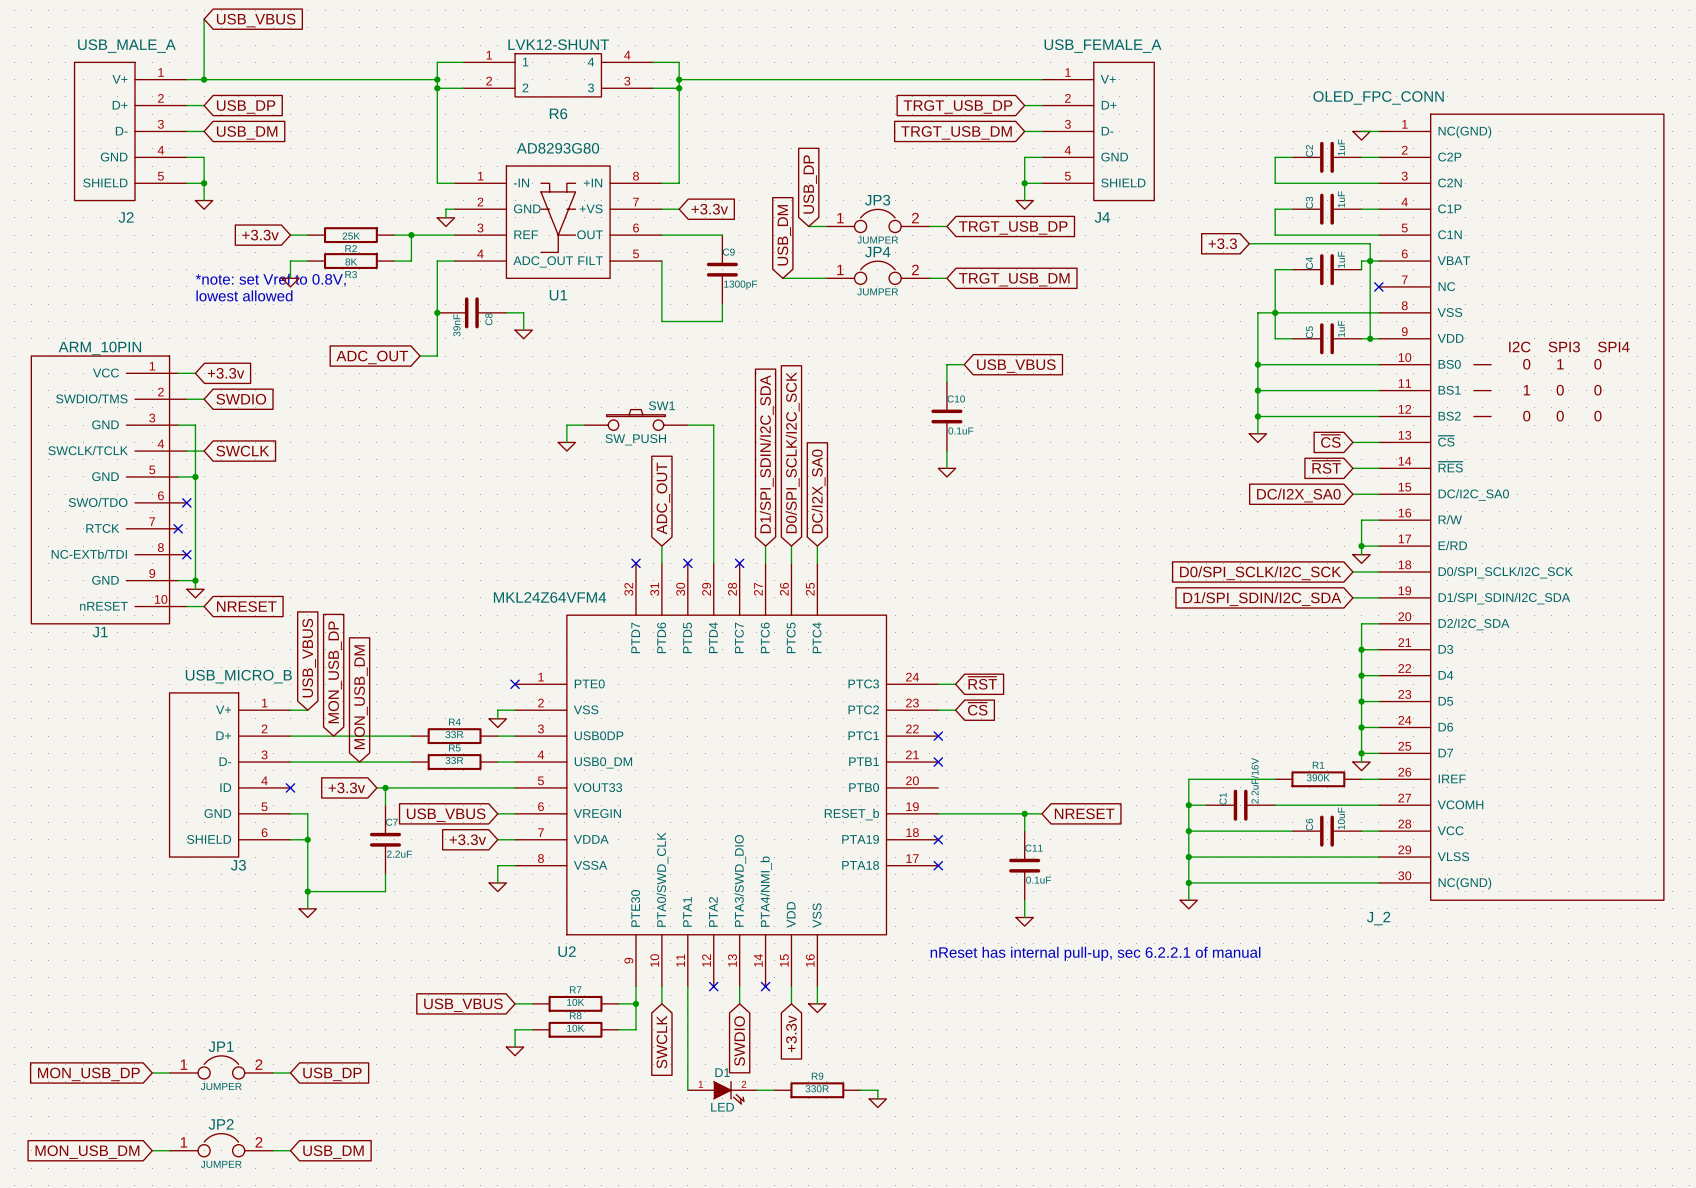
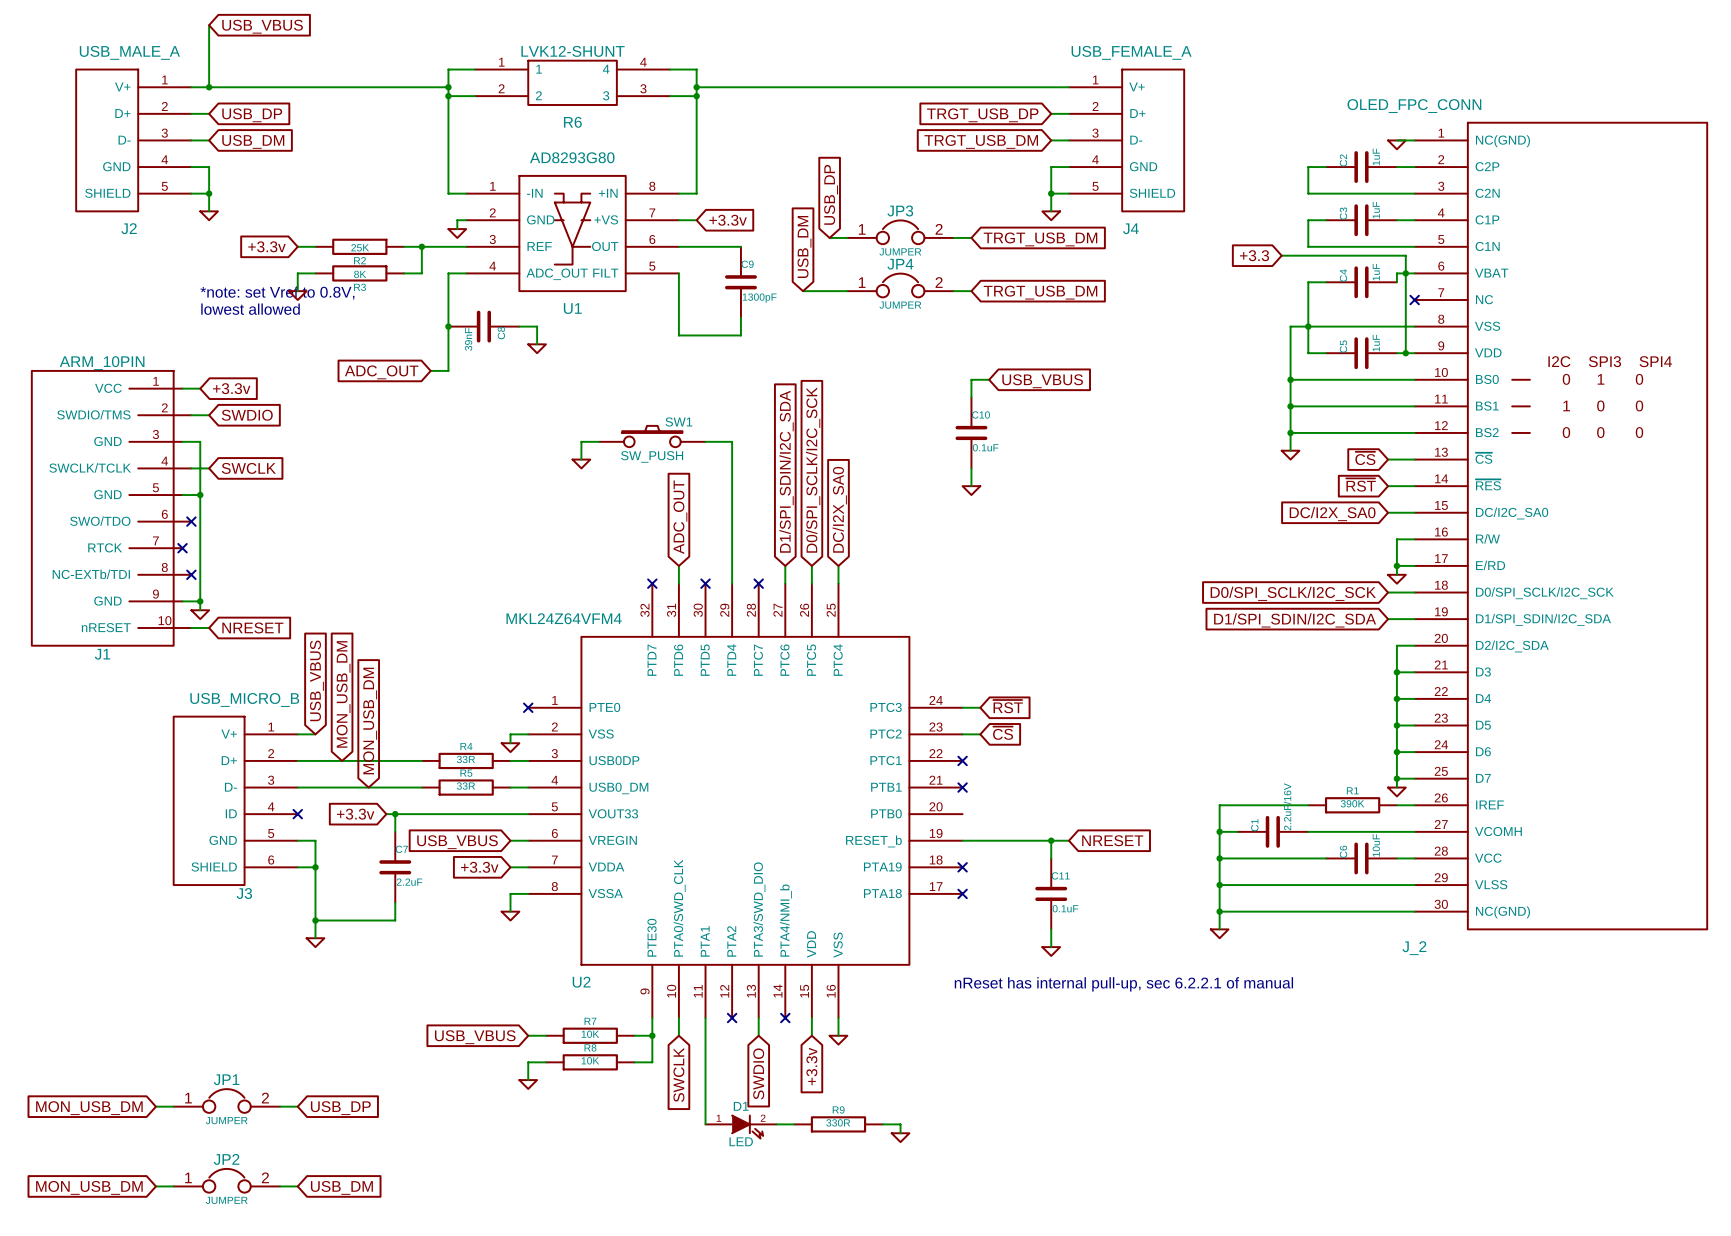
global label: TRGT_USB_DP (1013, 227) -> TRGT_USB_DM (1040, 239)
global label: MON_USB_DP (335, 672) -> MON_USB_DM (343, 694)
global label: MON_USB_DP (88, 1074) -> MON_USB_DM (89, 1108)

